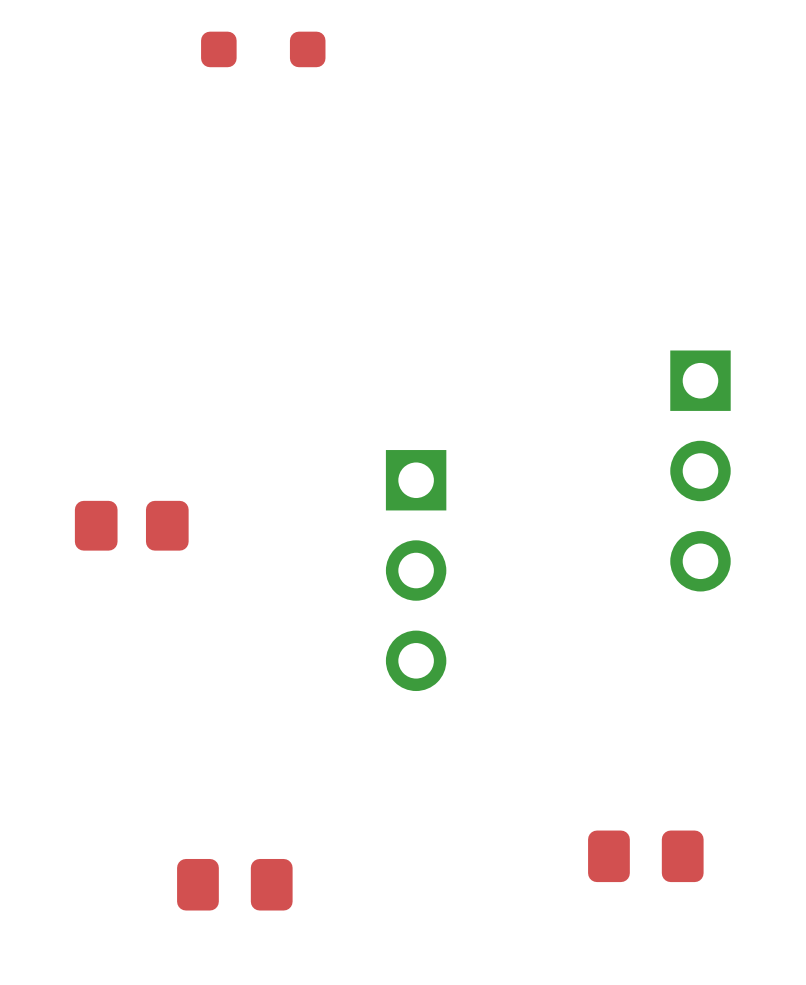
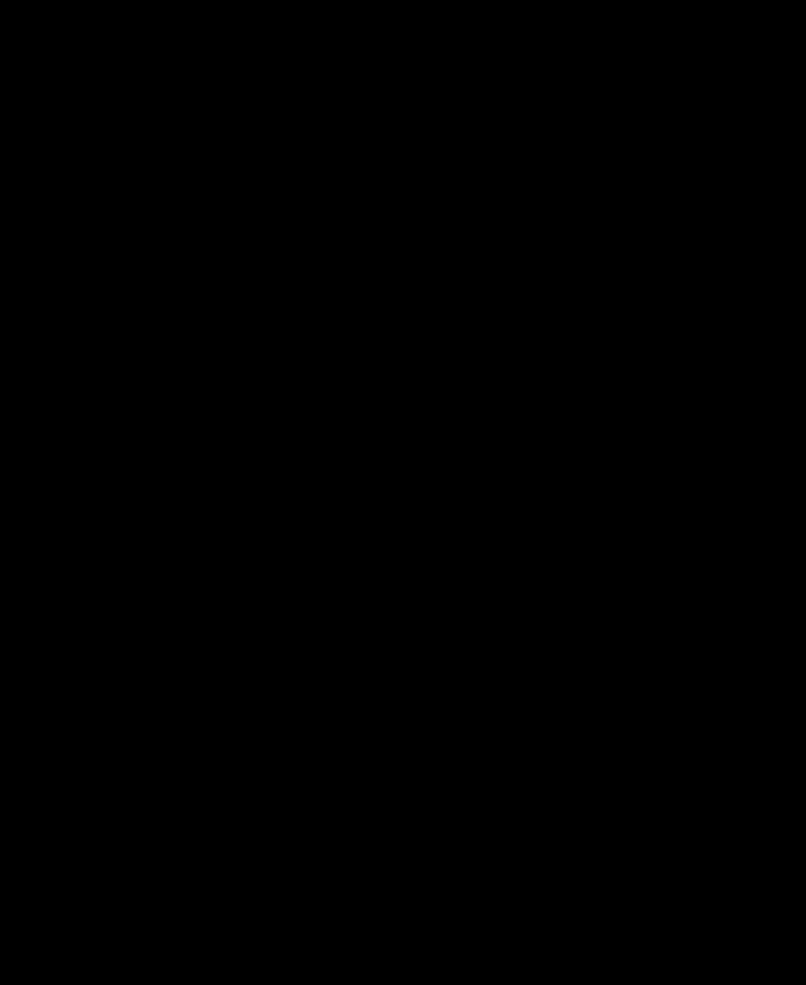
part: (263, 49) -> none
part: (700, 471) -> none
part: (131, 525) -> none
part: (416, 570) -> none
part: (645, 856) -> none
part: (234, 884) -> none

